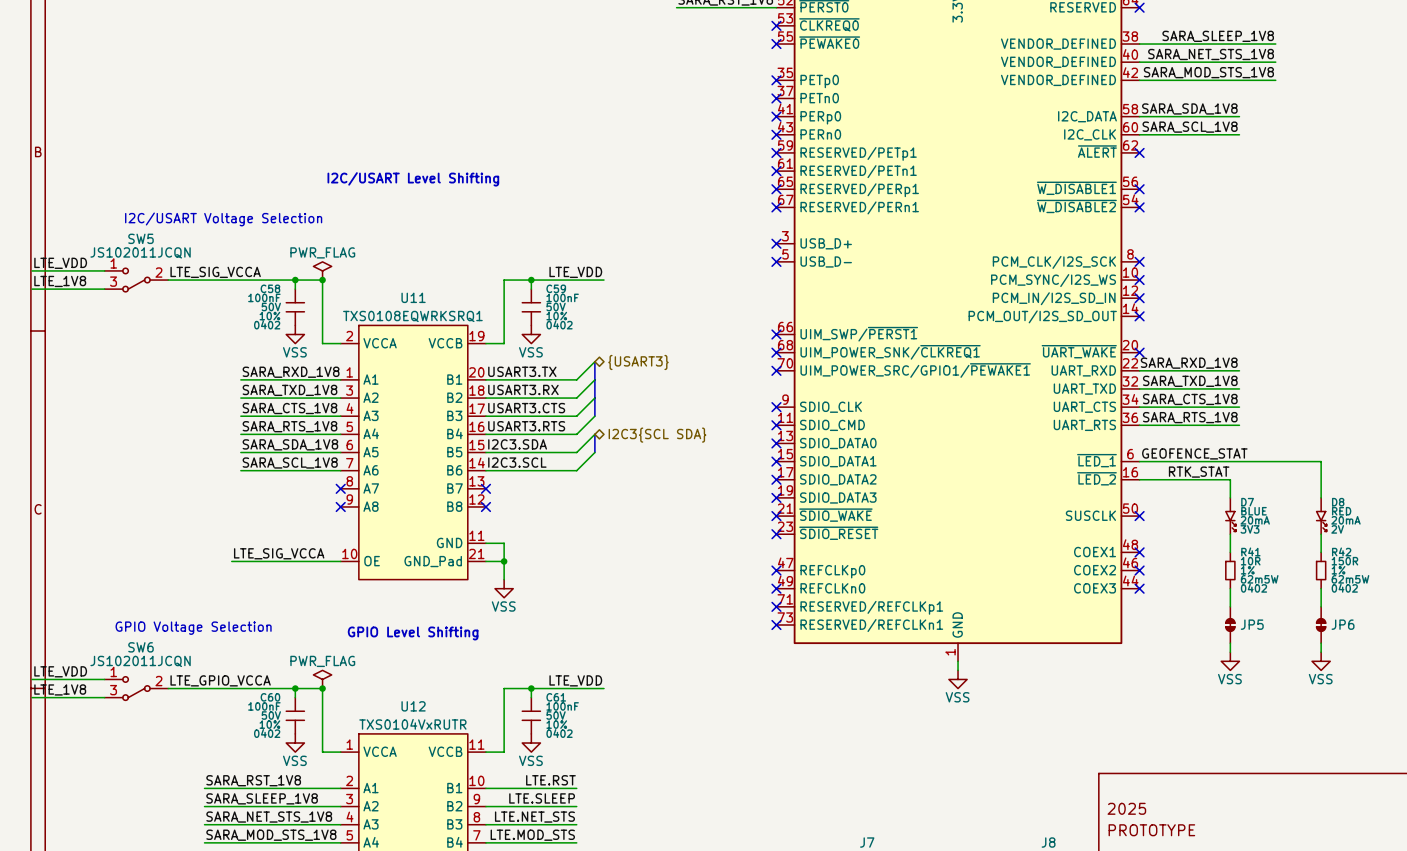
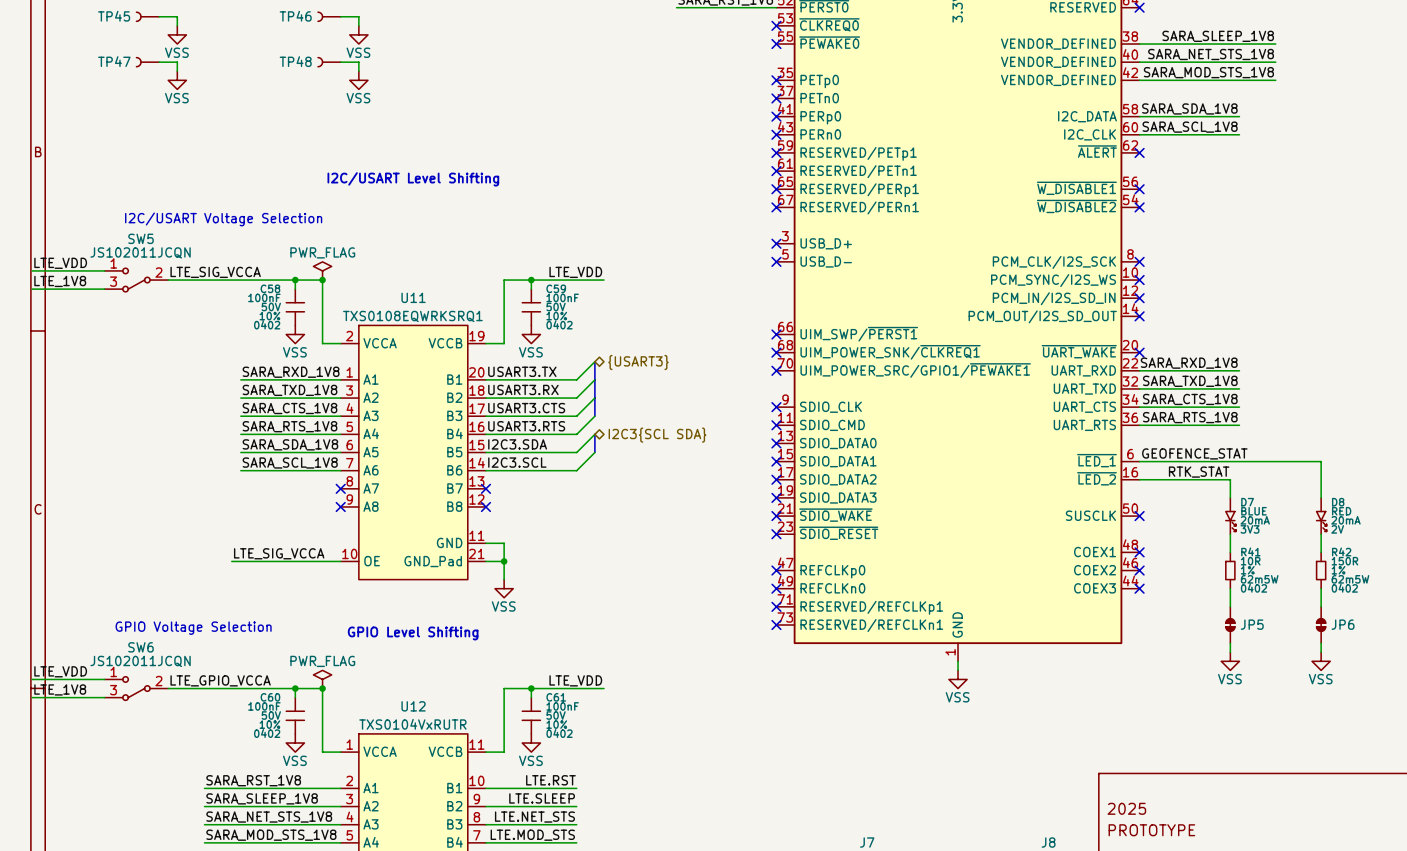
TP45: none -> (147, 16)
wire: none -> (159, 16) (177, 16) (177, 25)
TP46: none -> (329, 16)
wire: none -> (340, 16) (358, 16) (358, 25)
power symbol: none -> VSS (177, 34)
power symbol: none -> VSS (358, 34)
TP47: none -> (147, 62)
wire: none -> (159, 62) (177, 62) (177, 71)
TP48: none -> (329, 62)
wire: none -> (340, 62) (358, 62) (358, 71)
power symbol: none -> VSS (177, 80)
power symbol: none -> VSS (358, 80)

